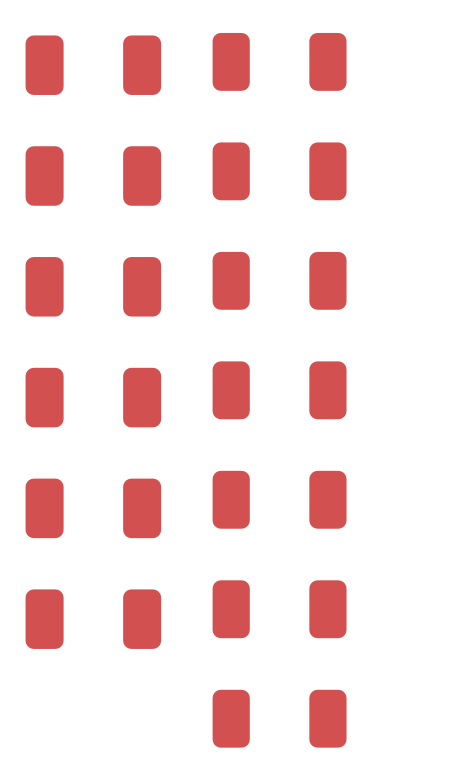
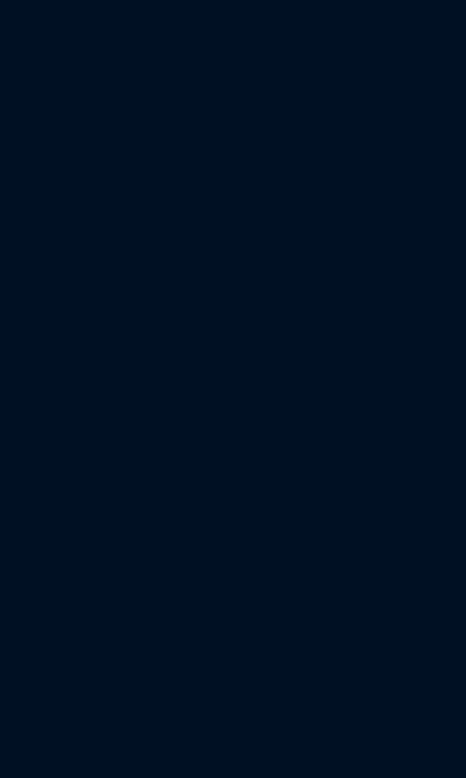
part: (279, 61) -> none
part: (93, 65) -> none
part: (279, 171) -> none
part: (93, 176) -> none
part: (279, 280) -> none
part: (93, 286) -> none
part: (279, 390) -> none
part: (93, 397) -> none
part: (279, 499) -> none
part: (93, 508) -> none
part: (279, 609) -> none
part: (93, 619) -> none
part: (279, 718) -> none

